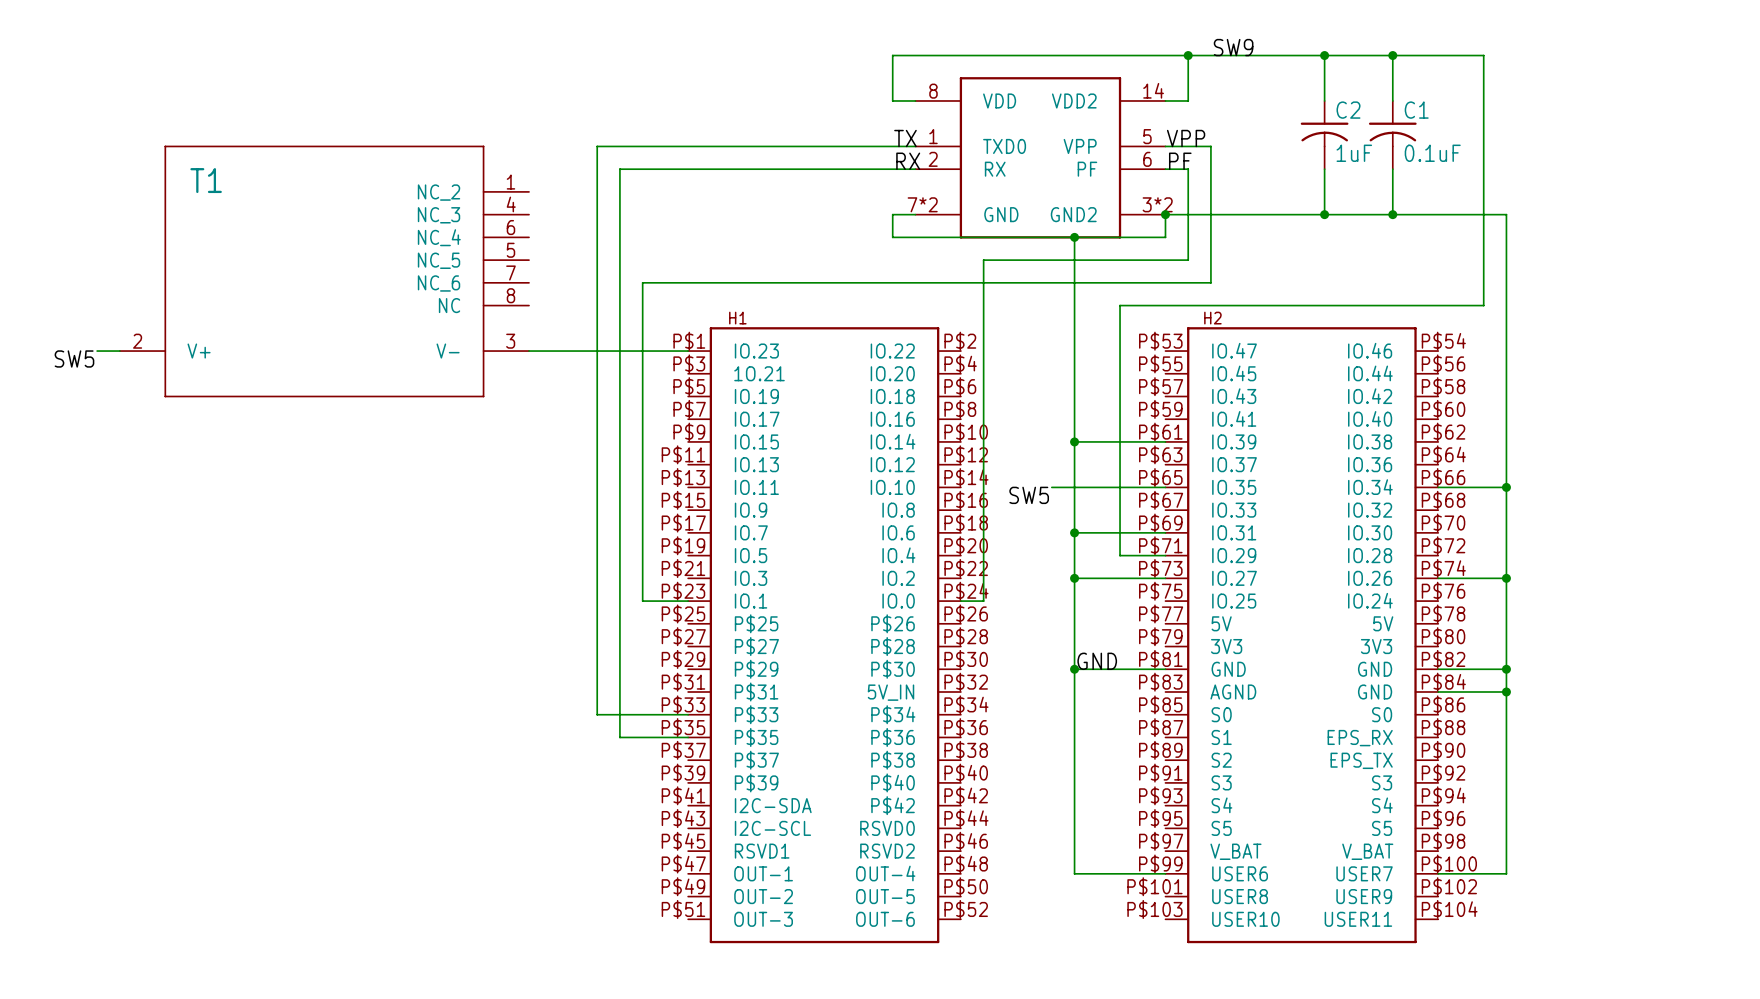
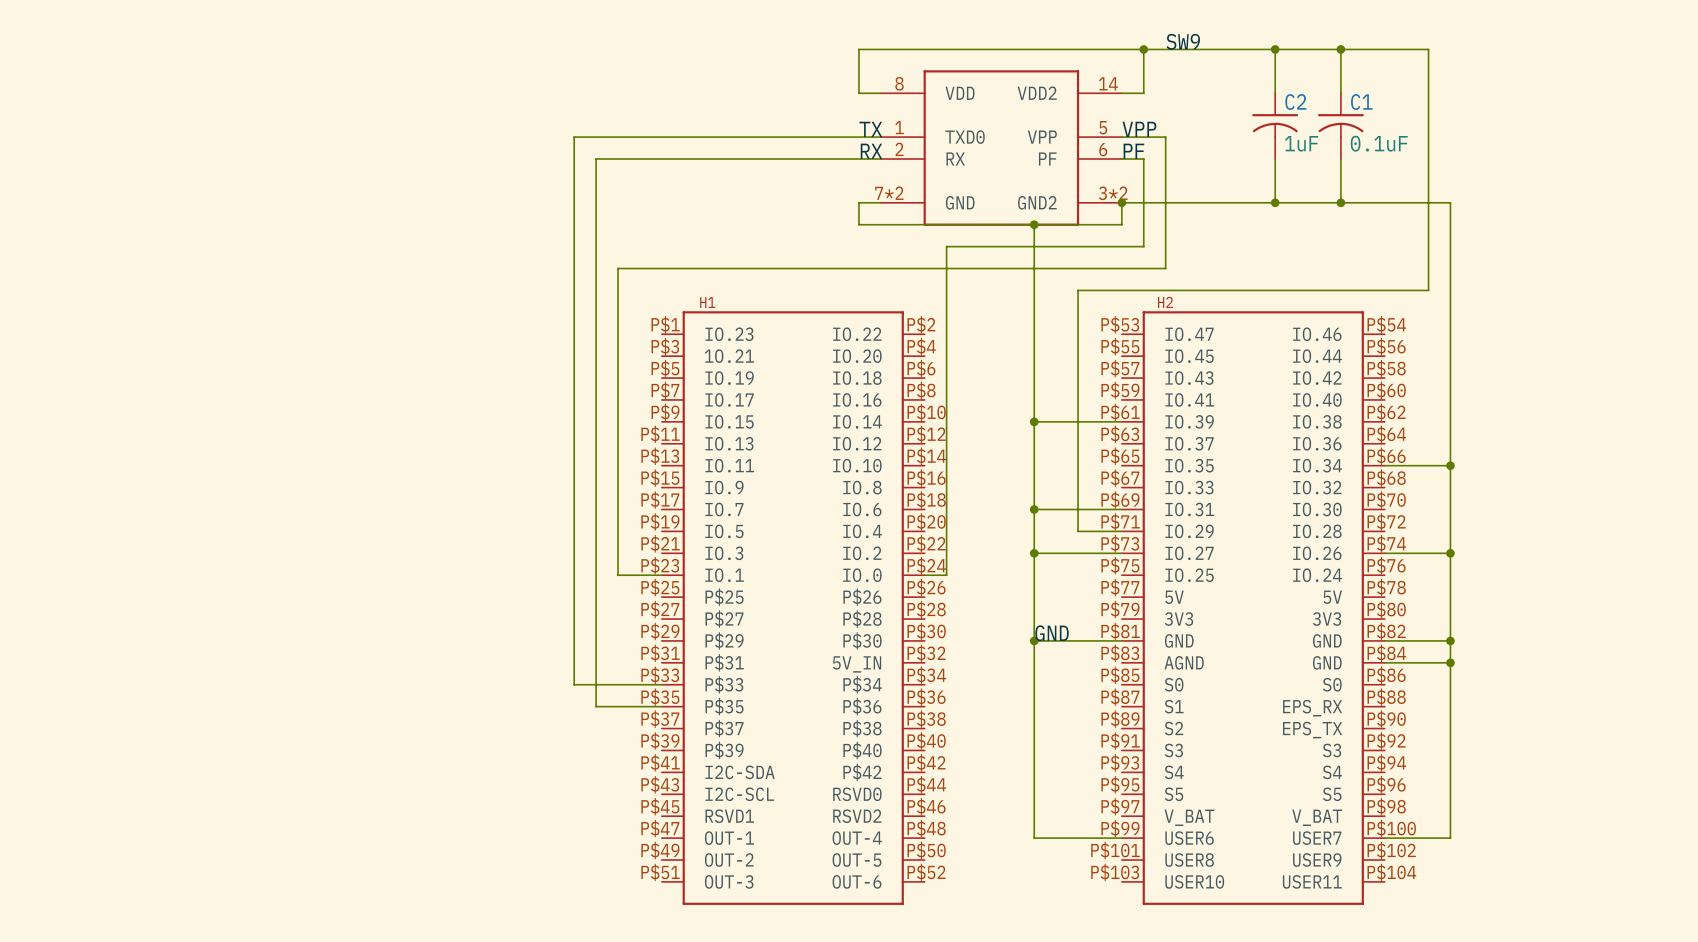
T1: (324, 271) -> none
wire: (97, 351) (119, 351) -> none
wire: (529, 351) (688, 351) -> none
label: SW5 (74, 358) -> none
wire: (1051, 487) (1165, 487) -> none
label: SW5 (1029, 495) -> none

